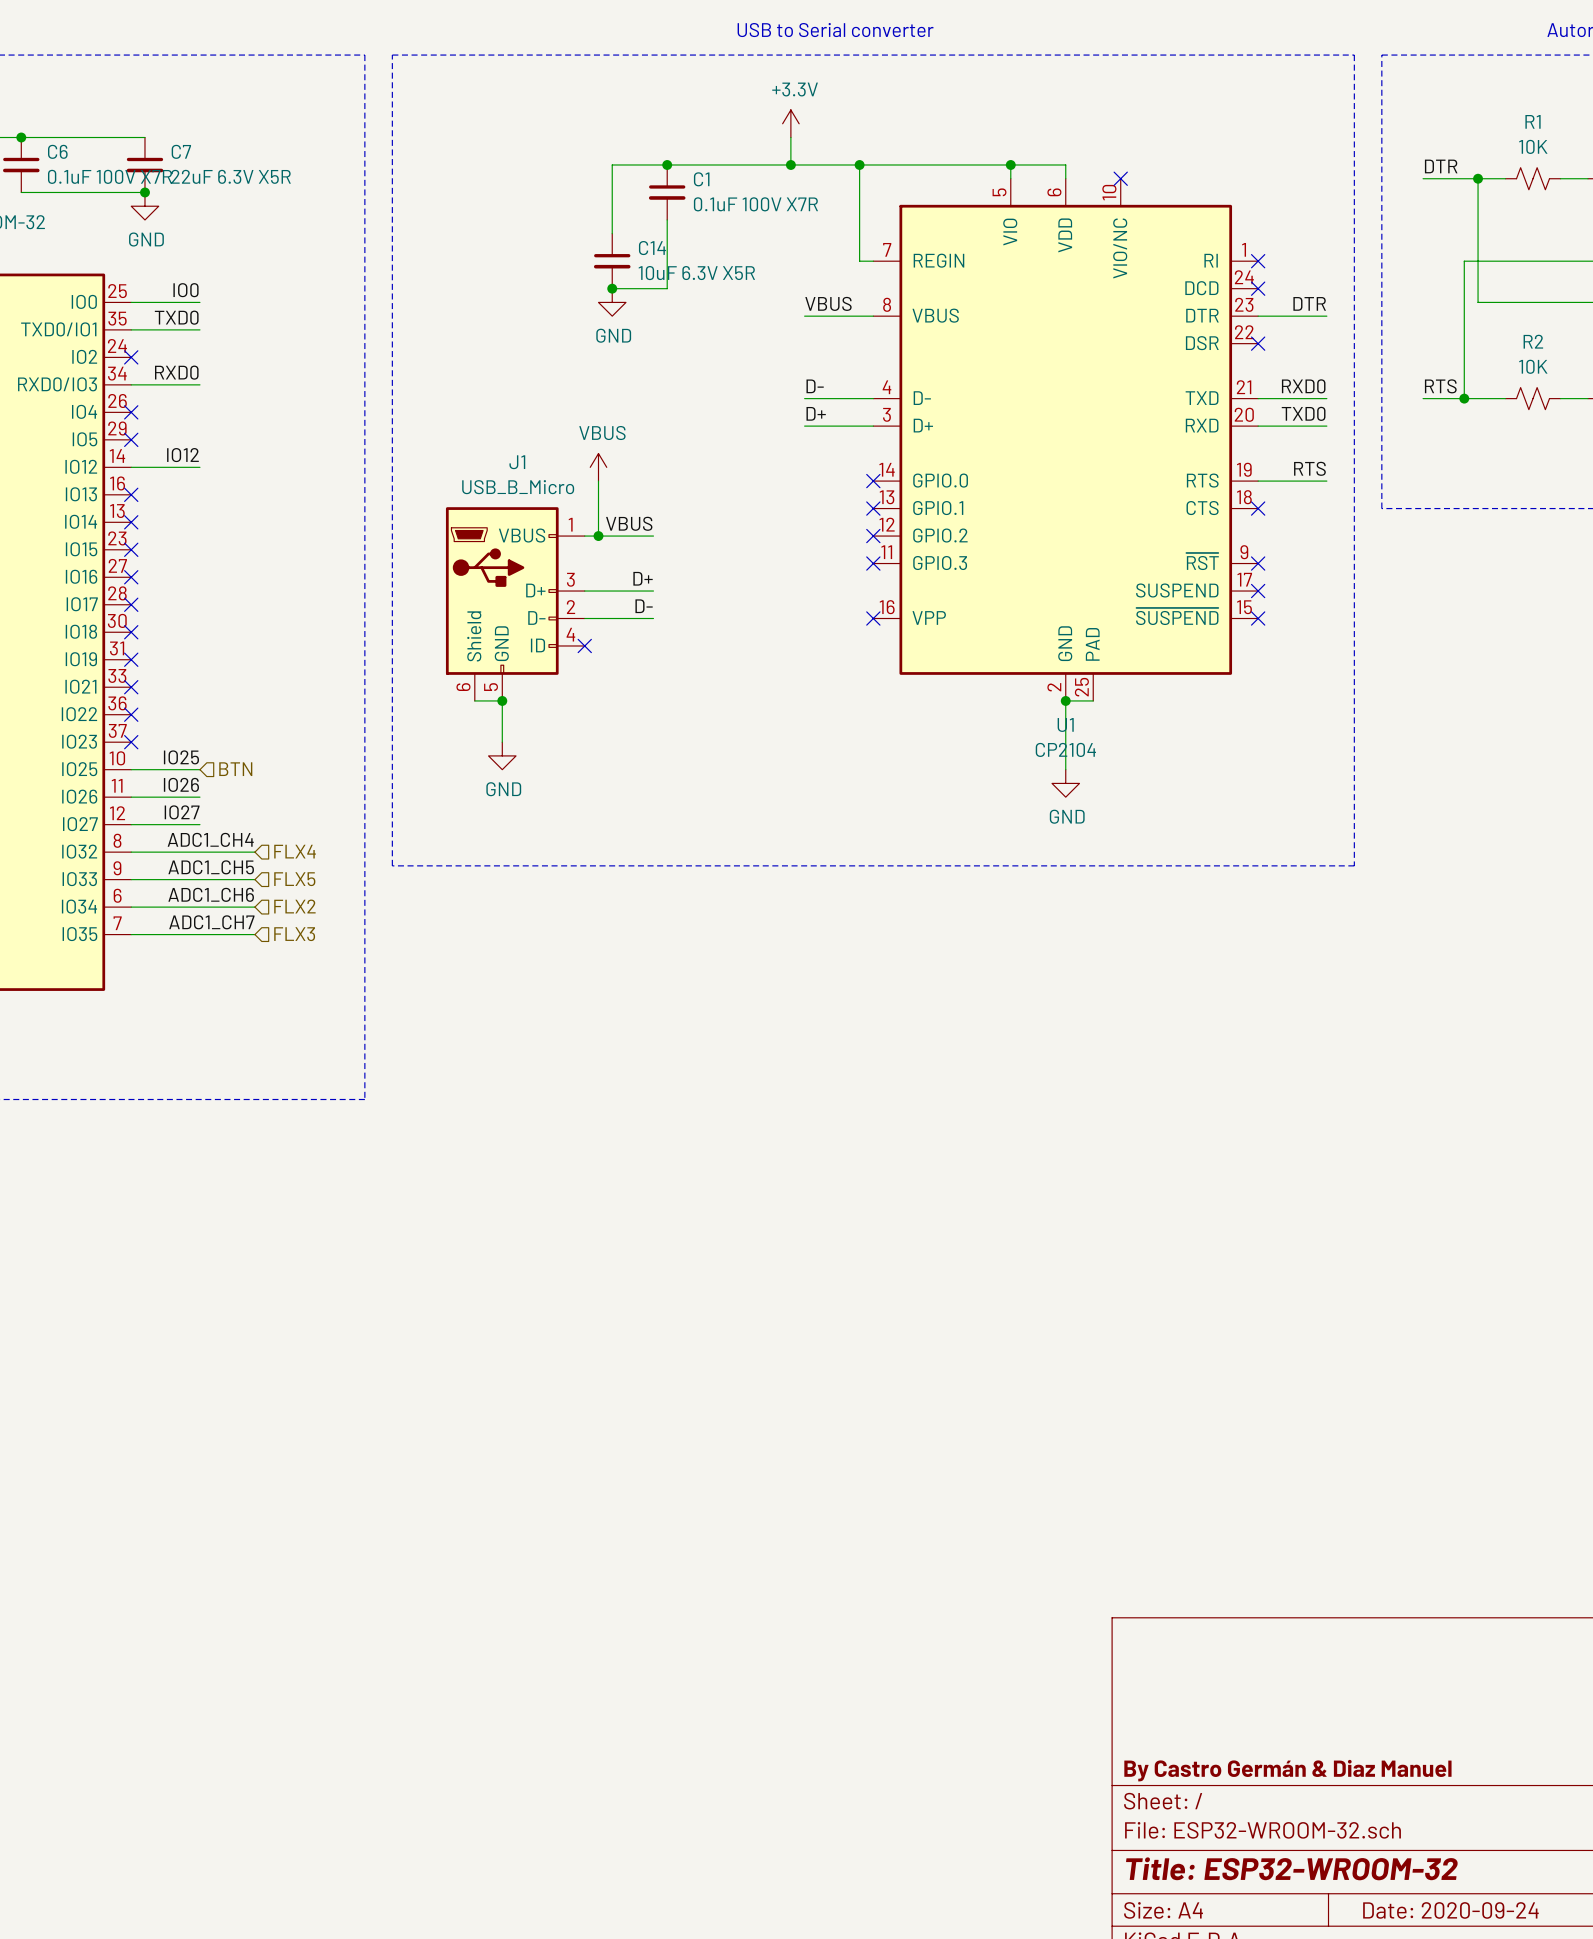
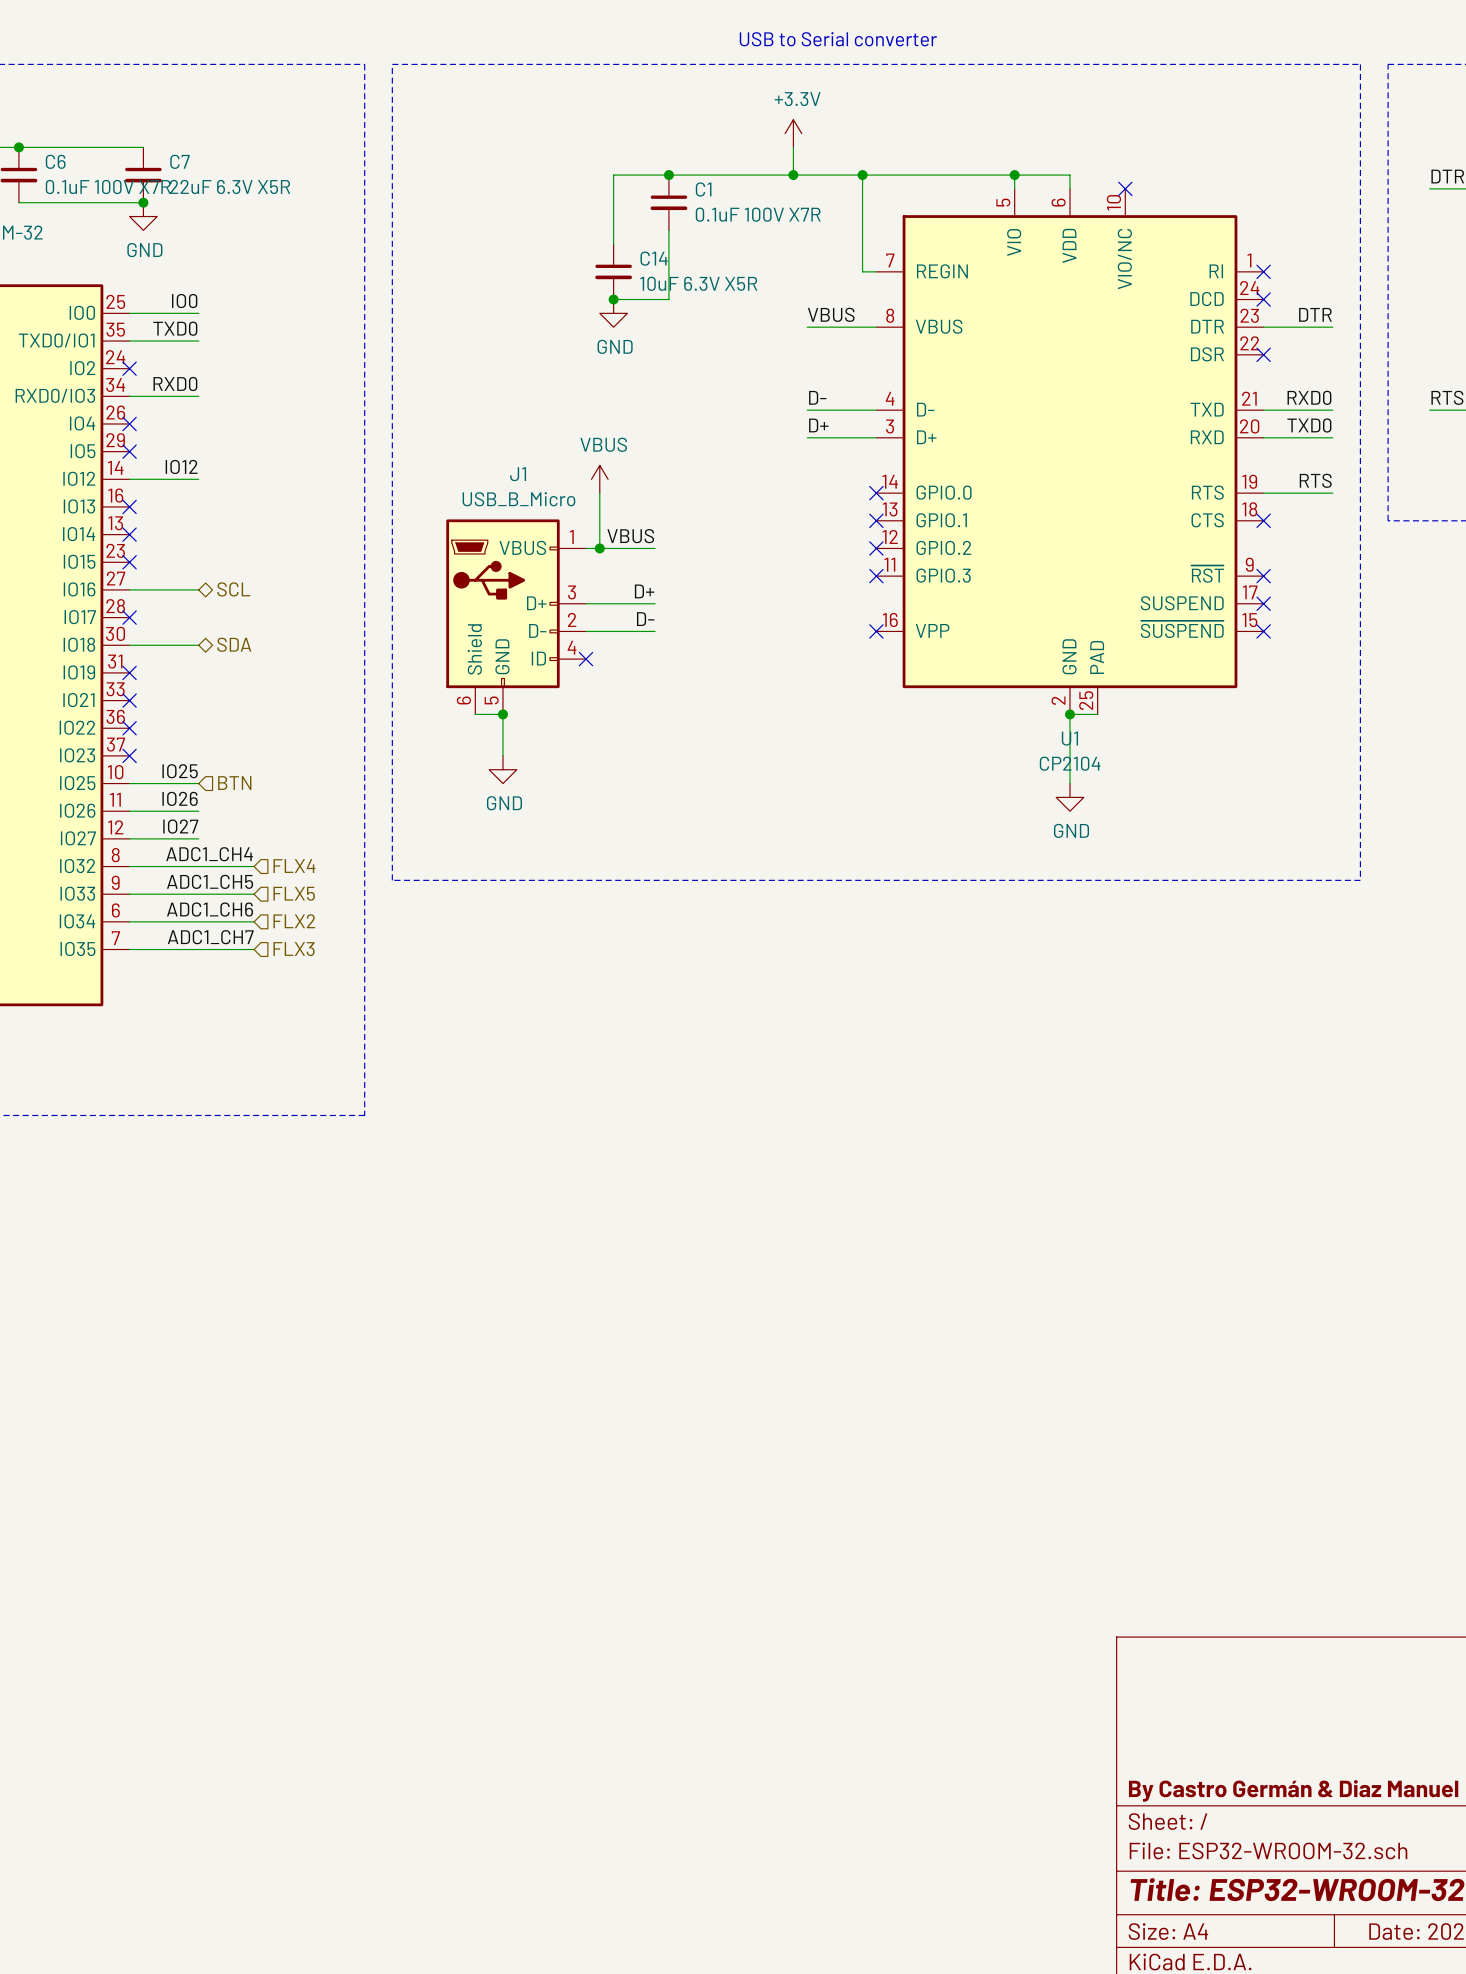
hierarchical label: none -> SCL (233, 589)
wire: none -> (129, 589) (198, 589)
no-connect mark: (131, 577) -> none
hierarchical label: none -> SDA (234, 644)
wire: none -> (129, 645) (198, 645)
no-connect mark: (131, 632) -> none

